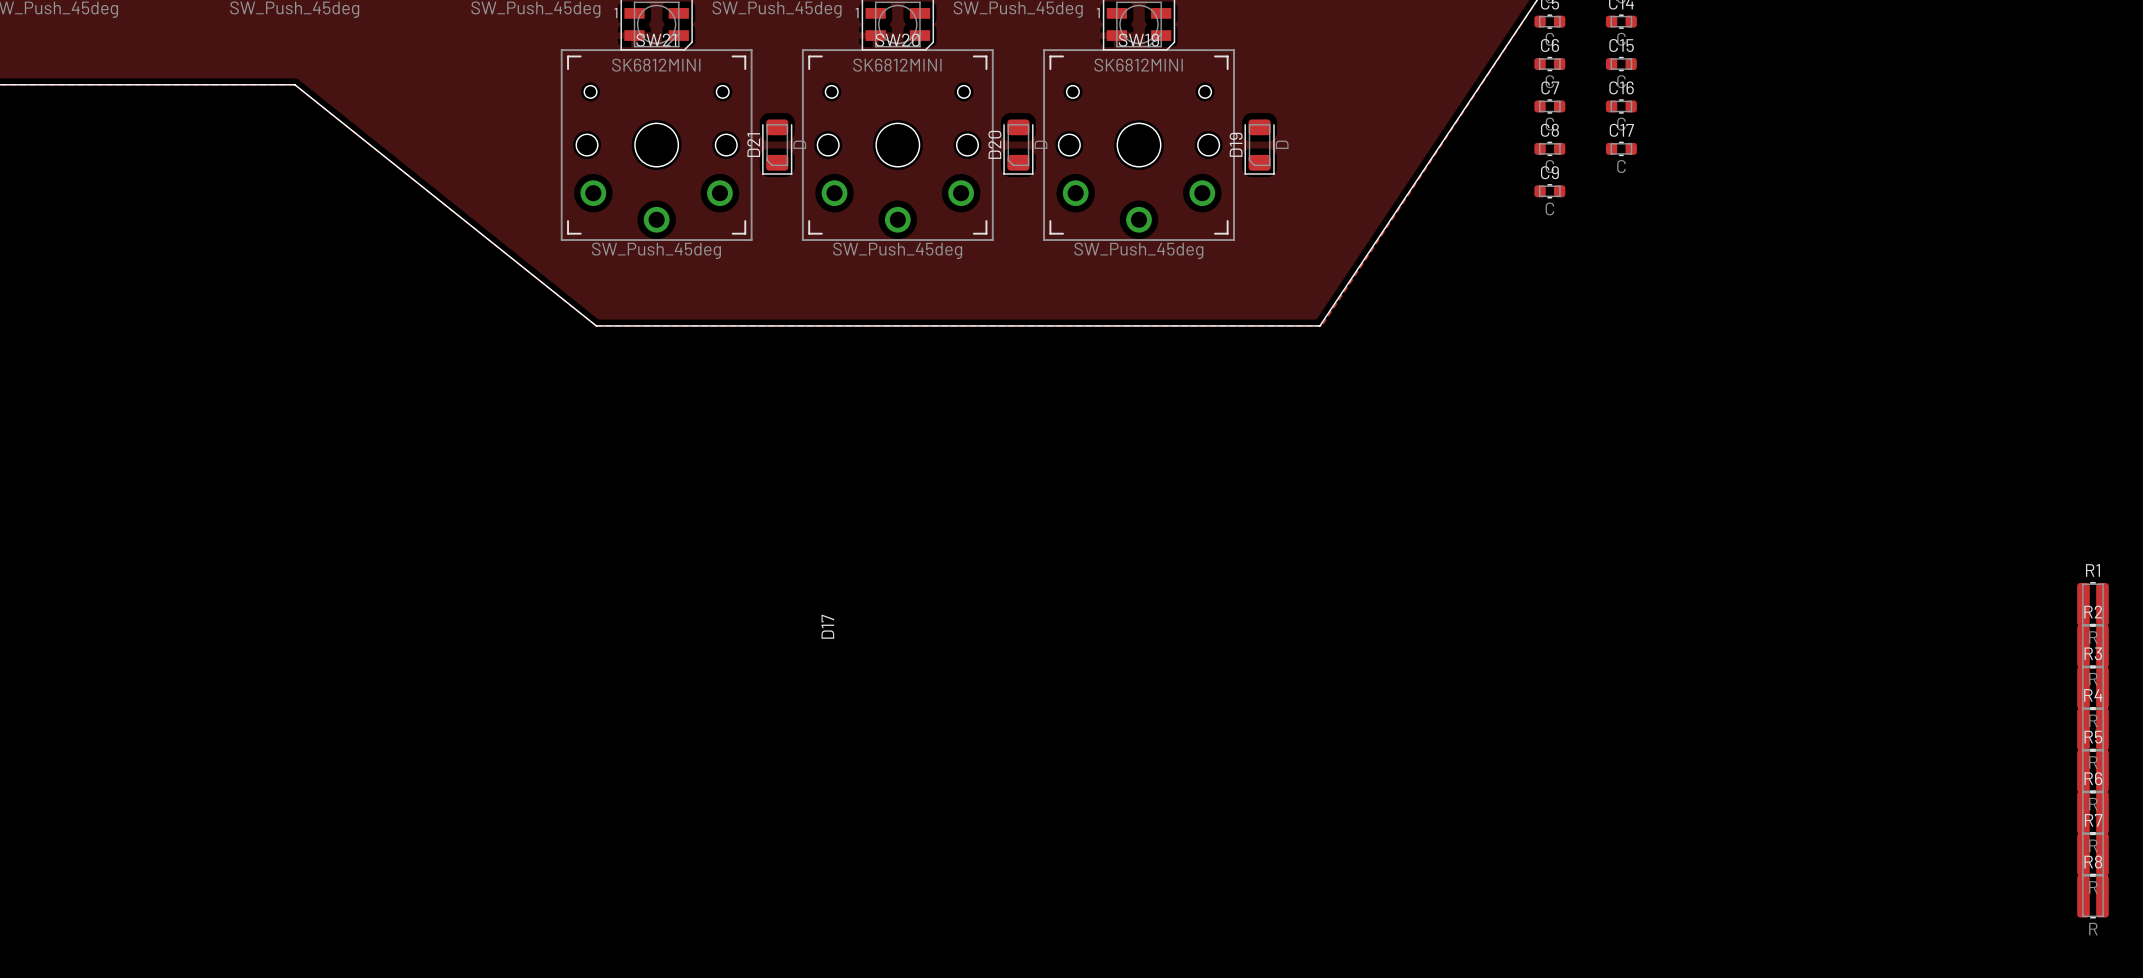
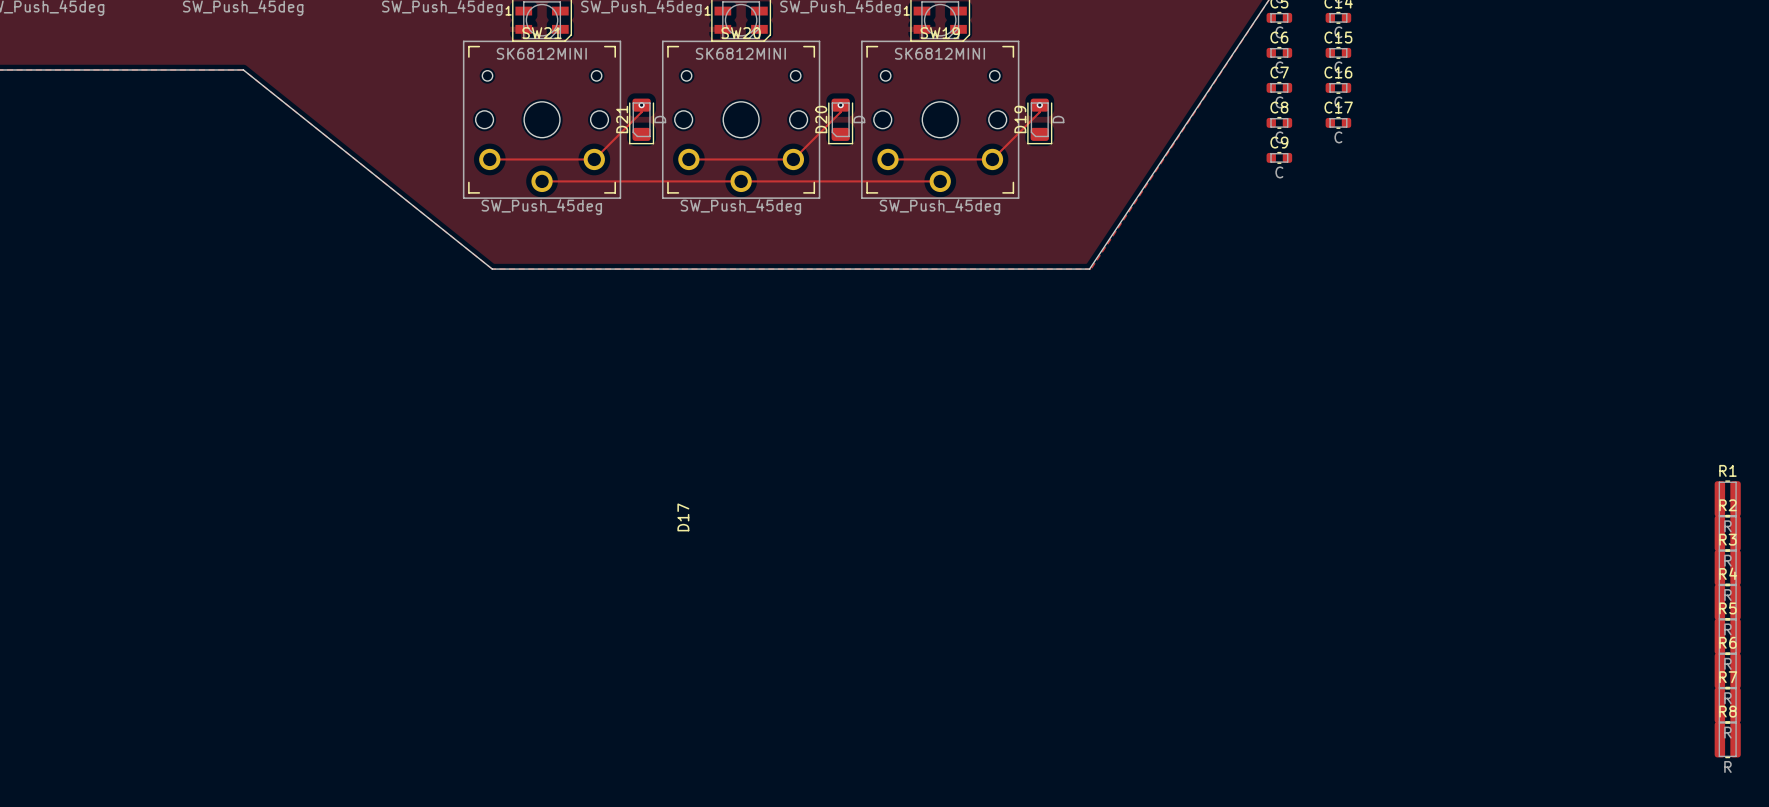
track: none -> (641, 105) (641, 112) (594, 159) (489, 159)
via: none -> (641, 105)
track: none -> (840, 105) (840, 112) (793, 159) (688, 159)
via: none -> (840, 105)
track: none -> (1039, 105) (1039, 112) (992, 159) (887, 159)
via: none -> (1039, 105)
track: none -> (542, 181) (940, 181)

